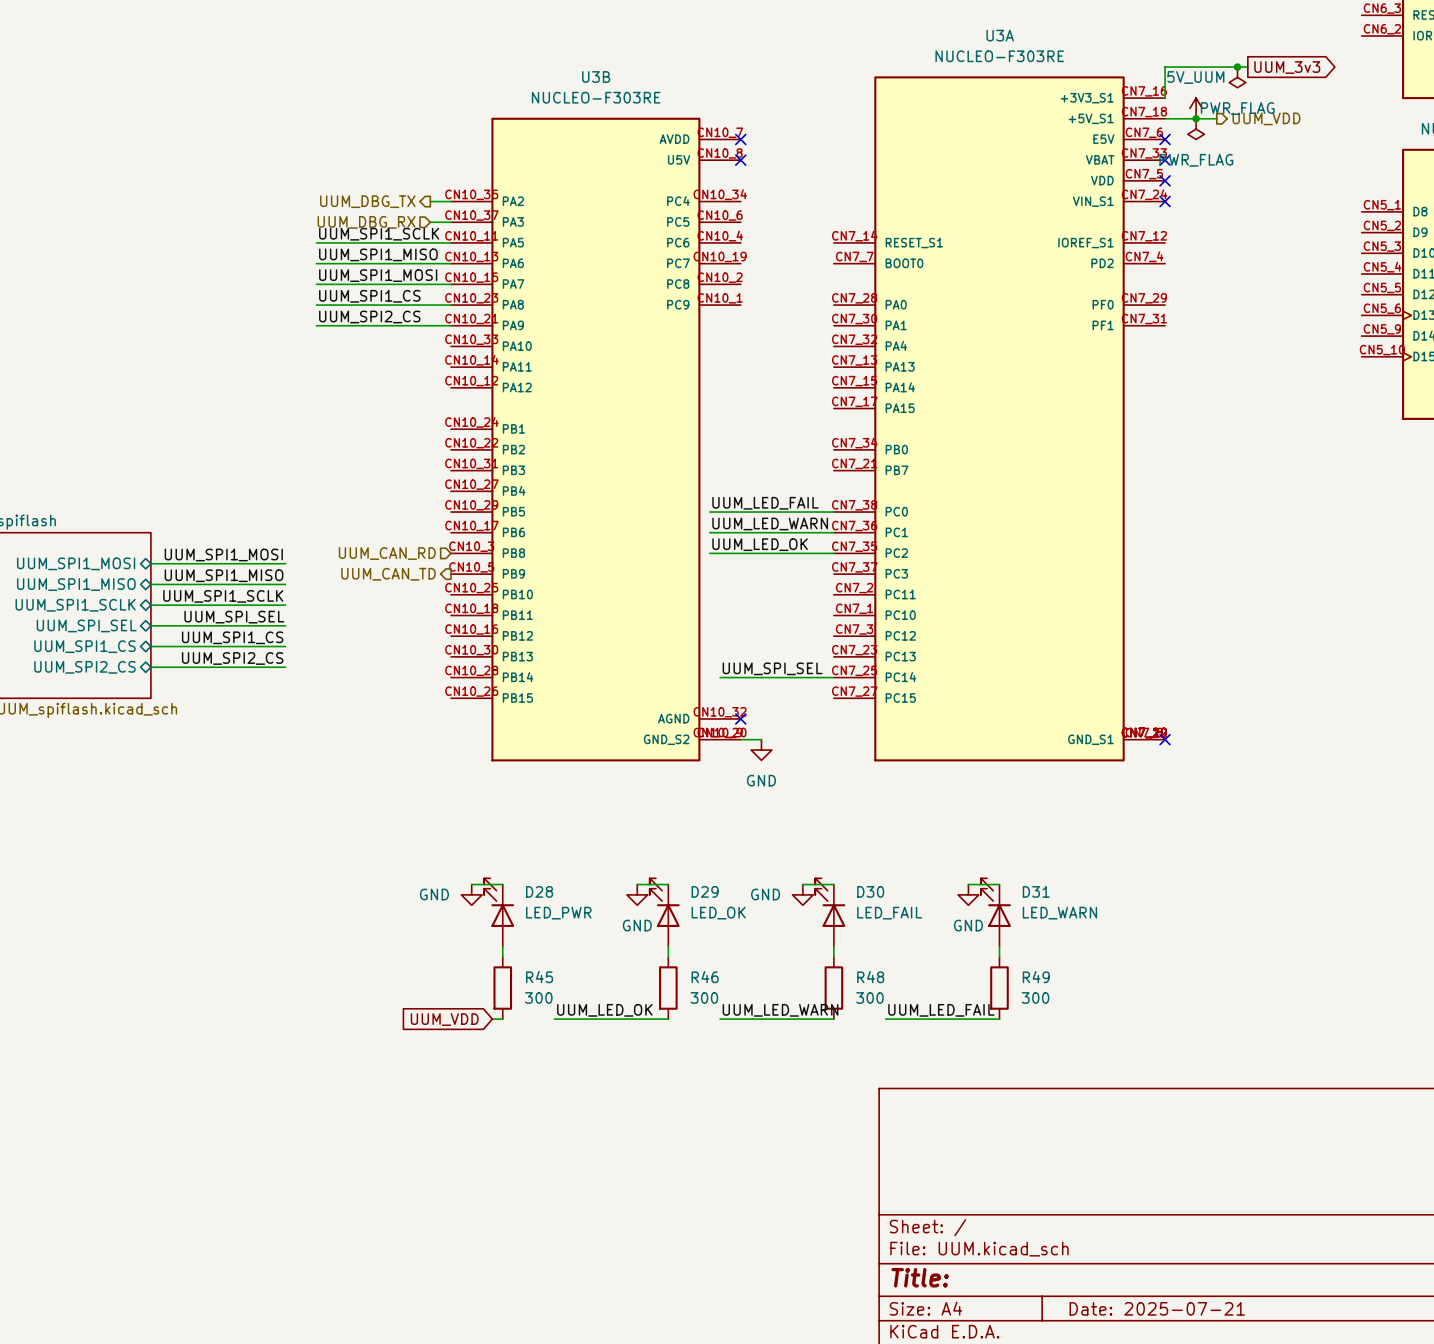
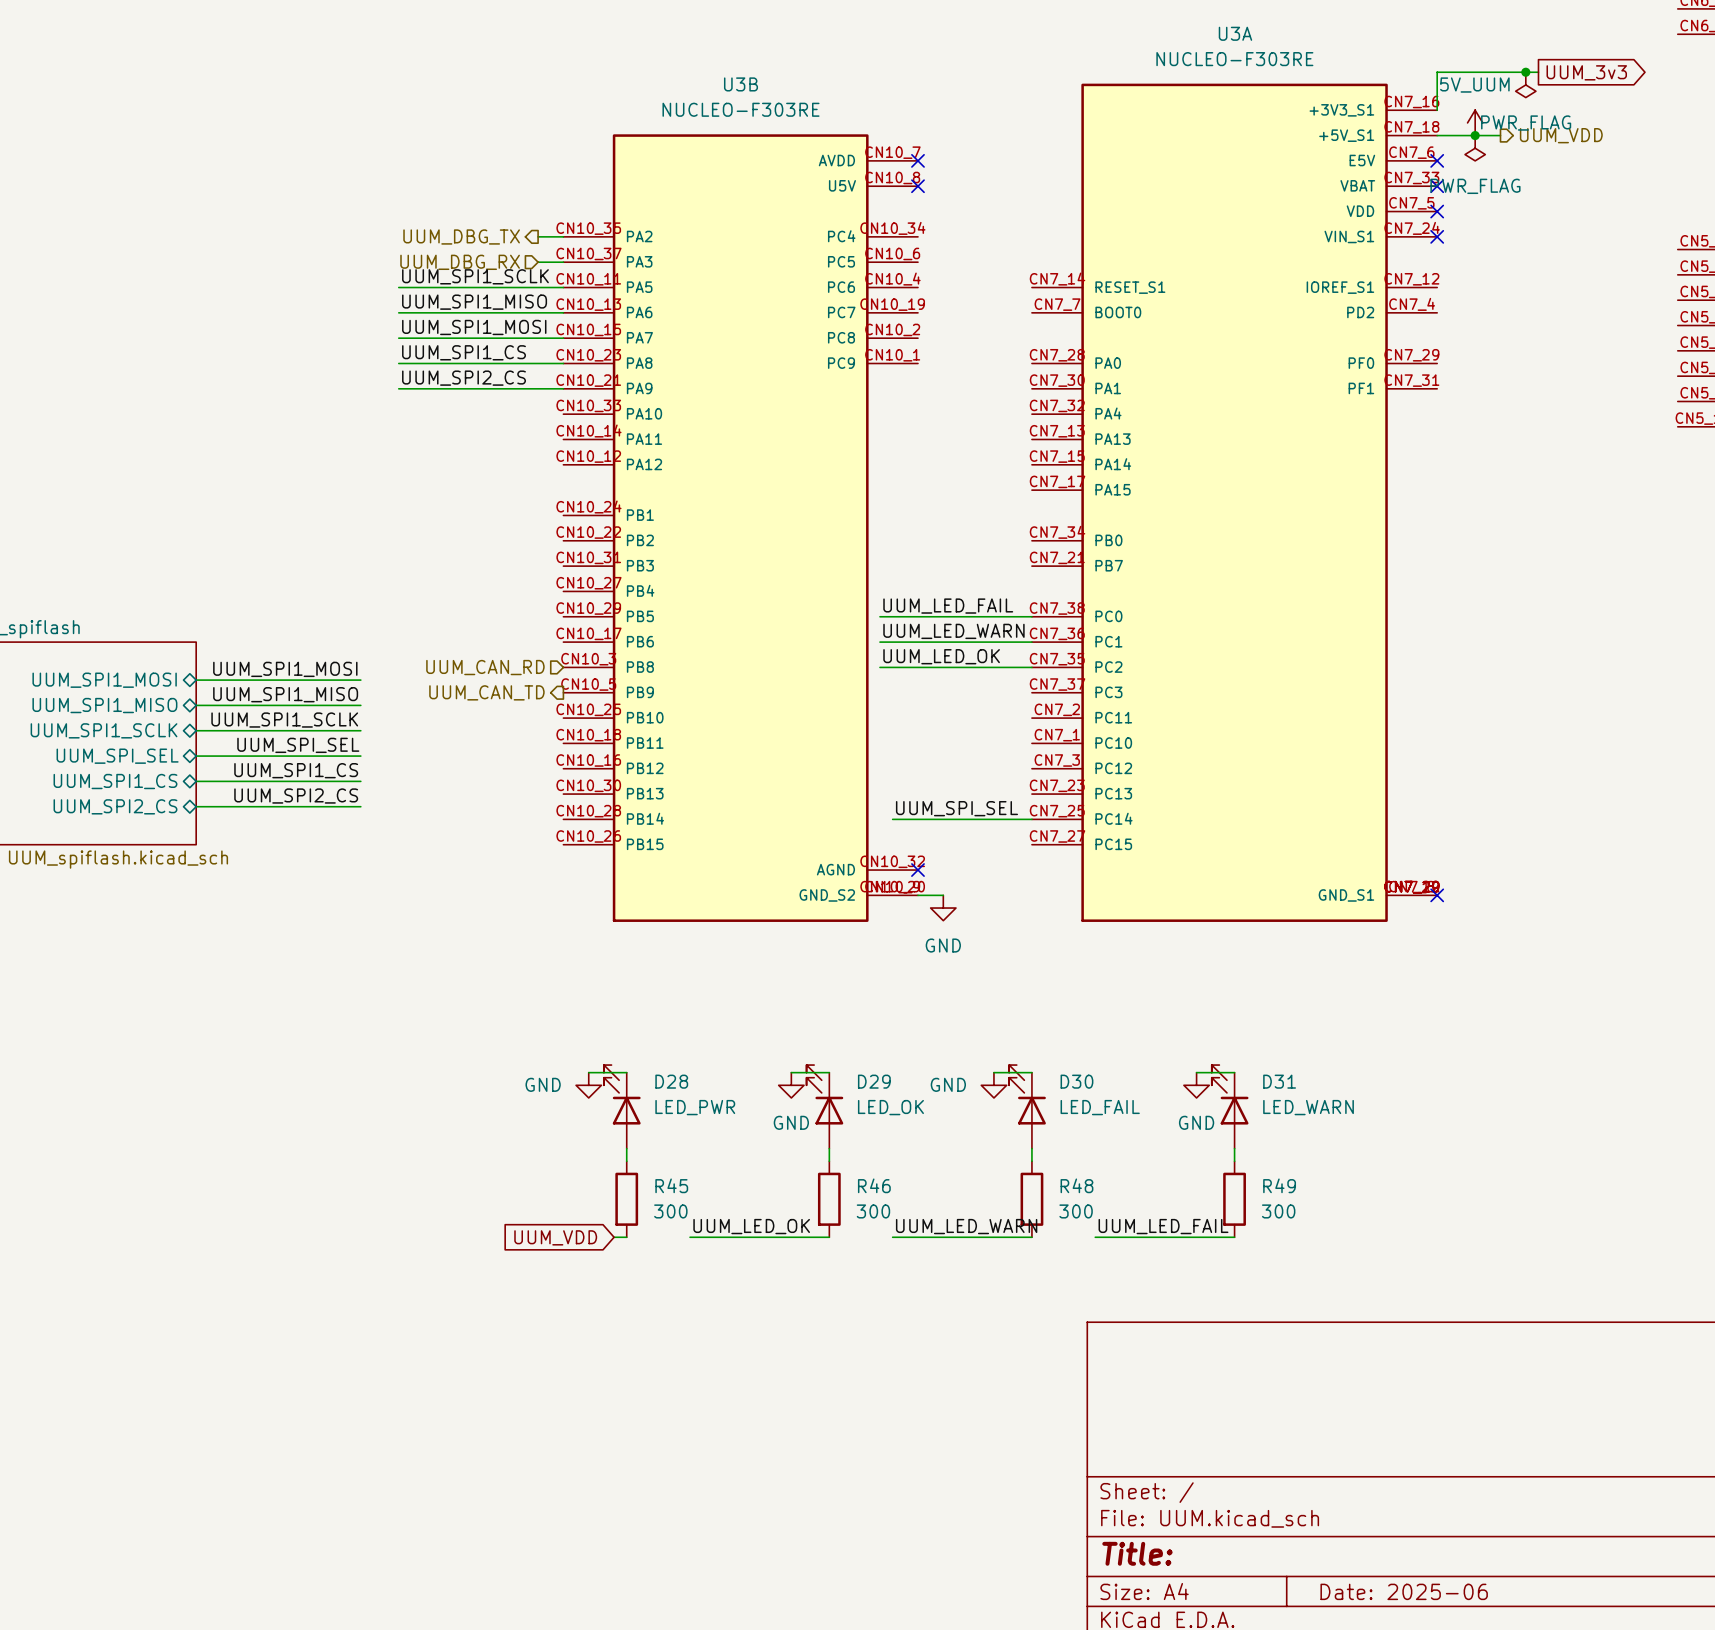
title block: Date: 2025-07-21 (1157, 1308) -> Date: 2025-06 (1404, 1591)

